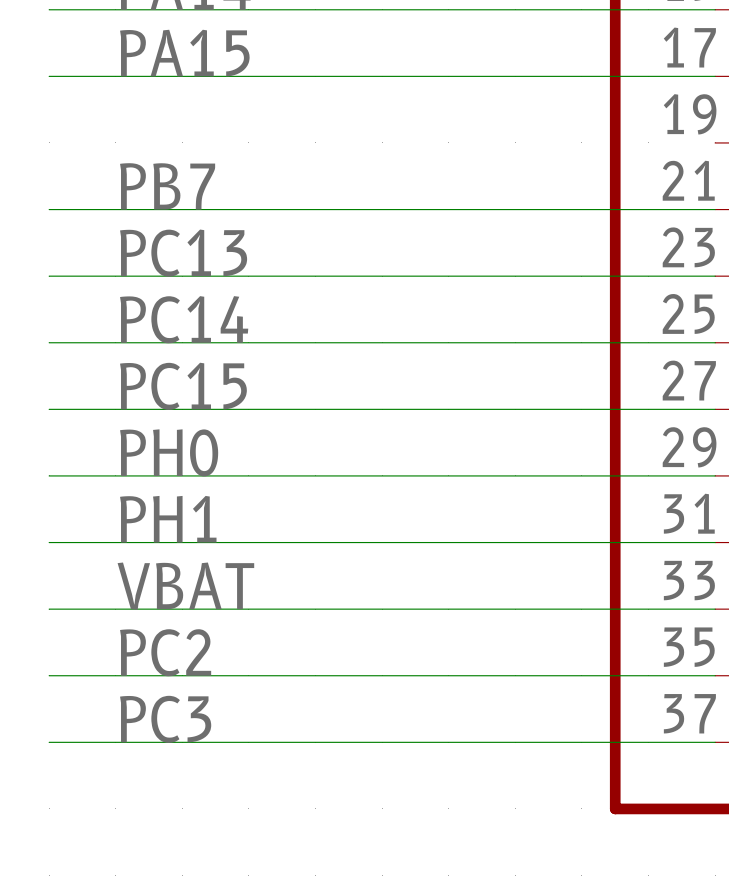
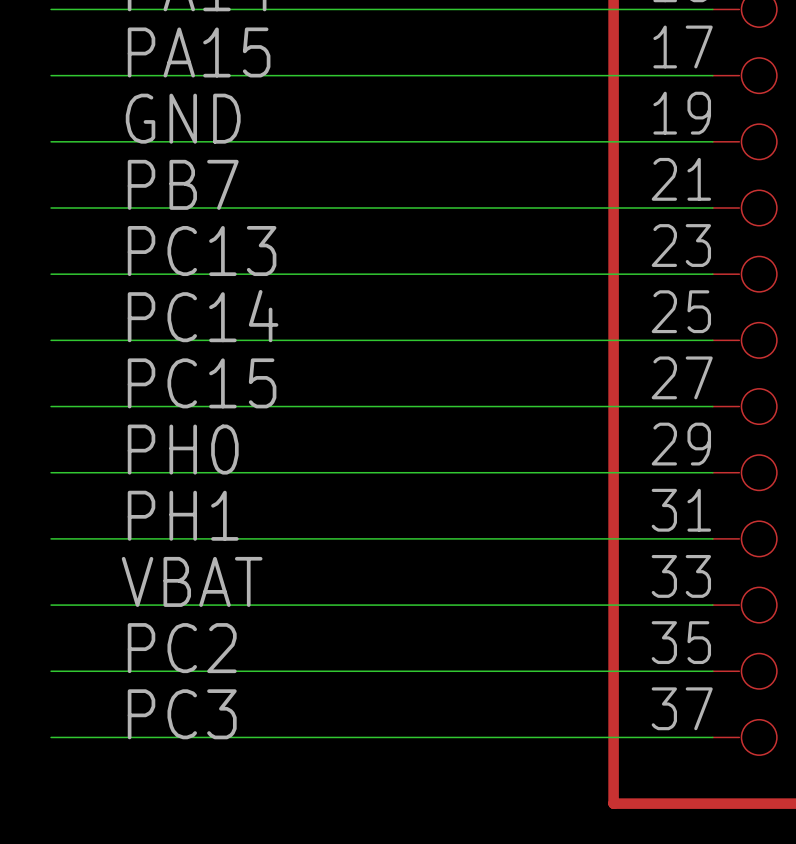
label: none -> GND (183, 118)
wire: none -> (51, 141) (712, 141)

